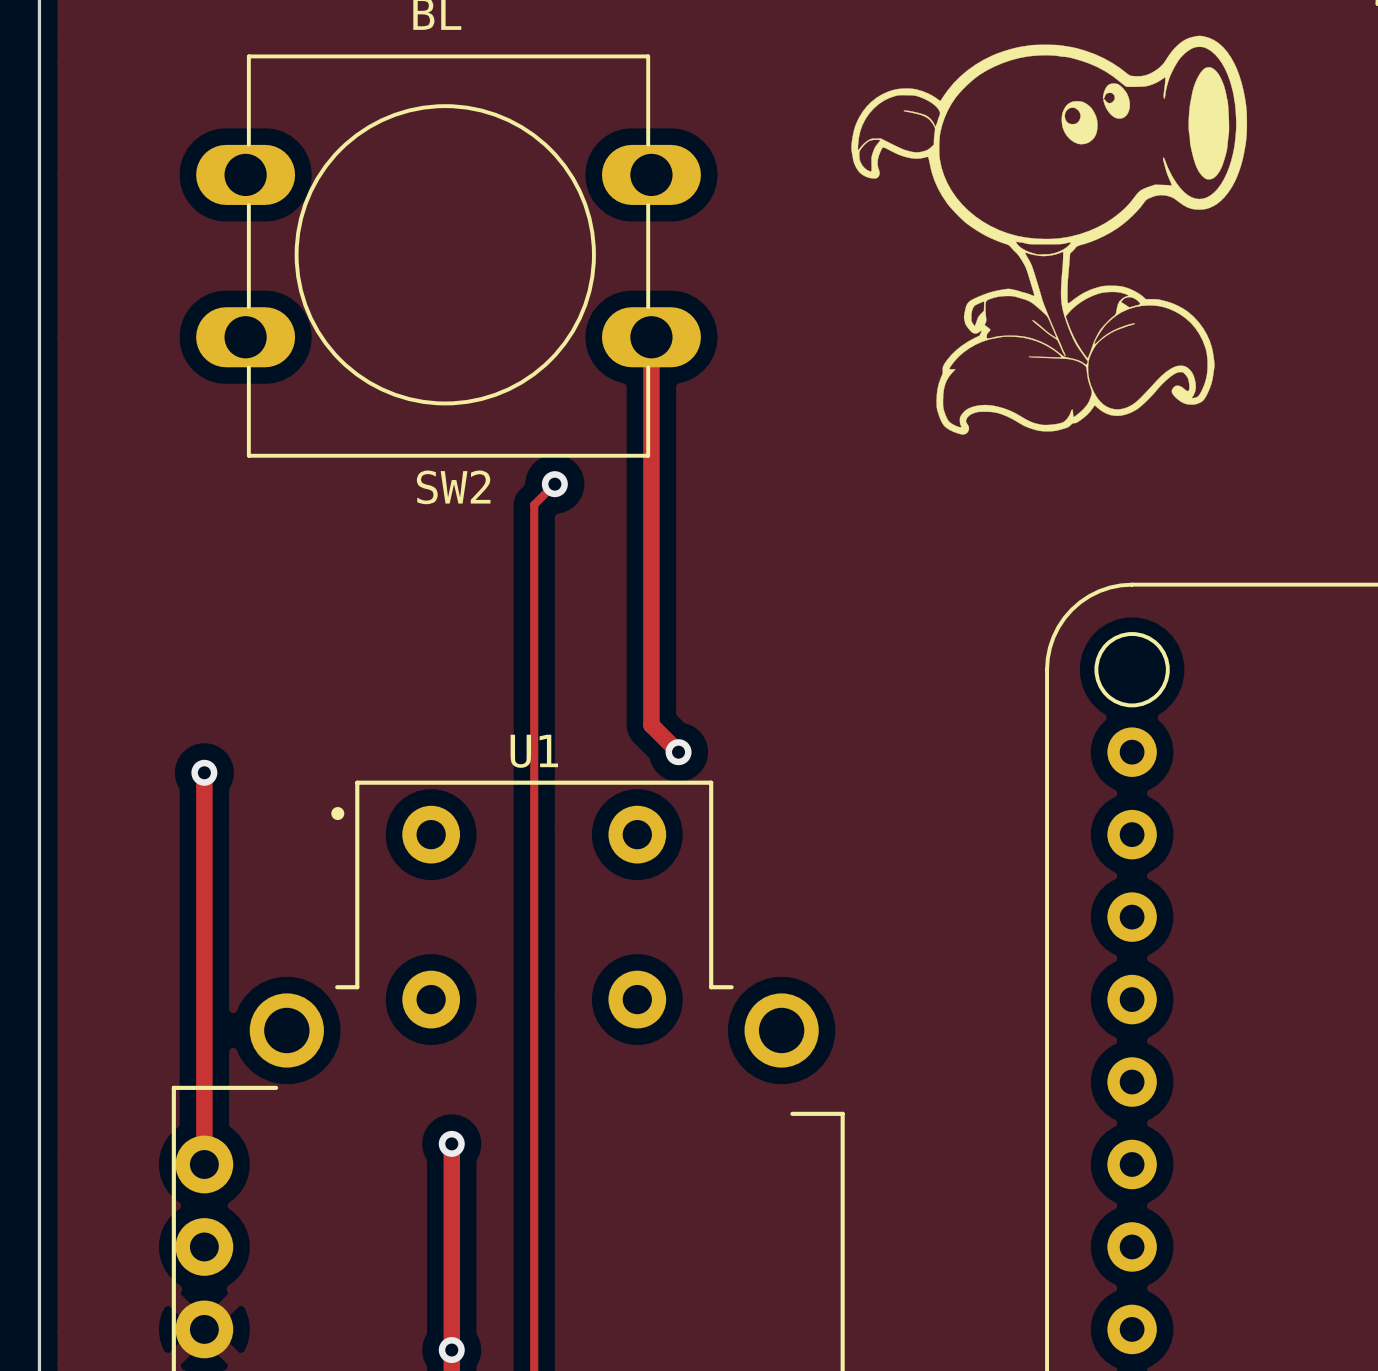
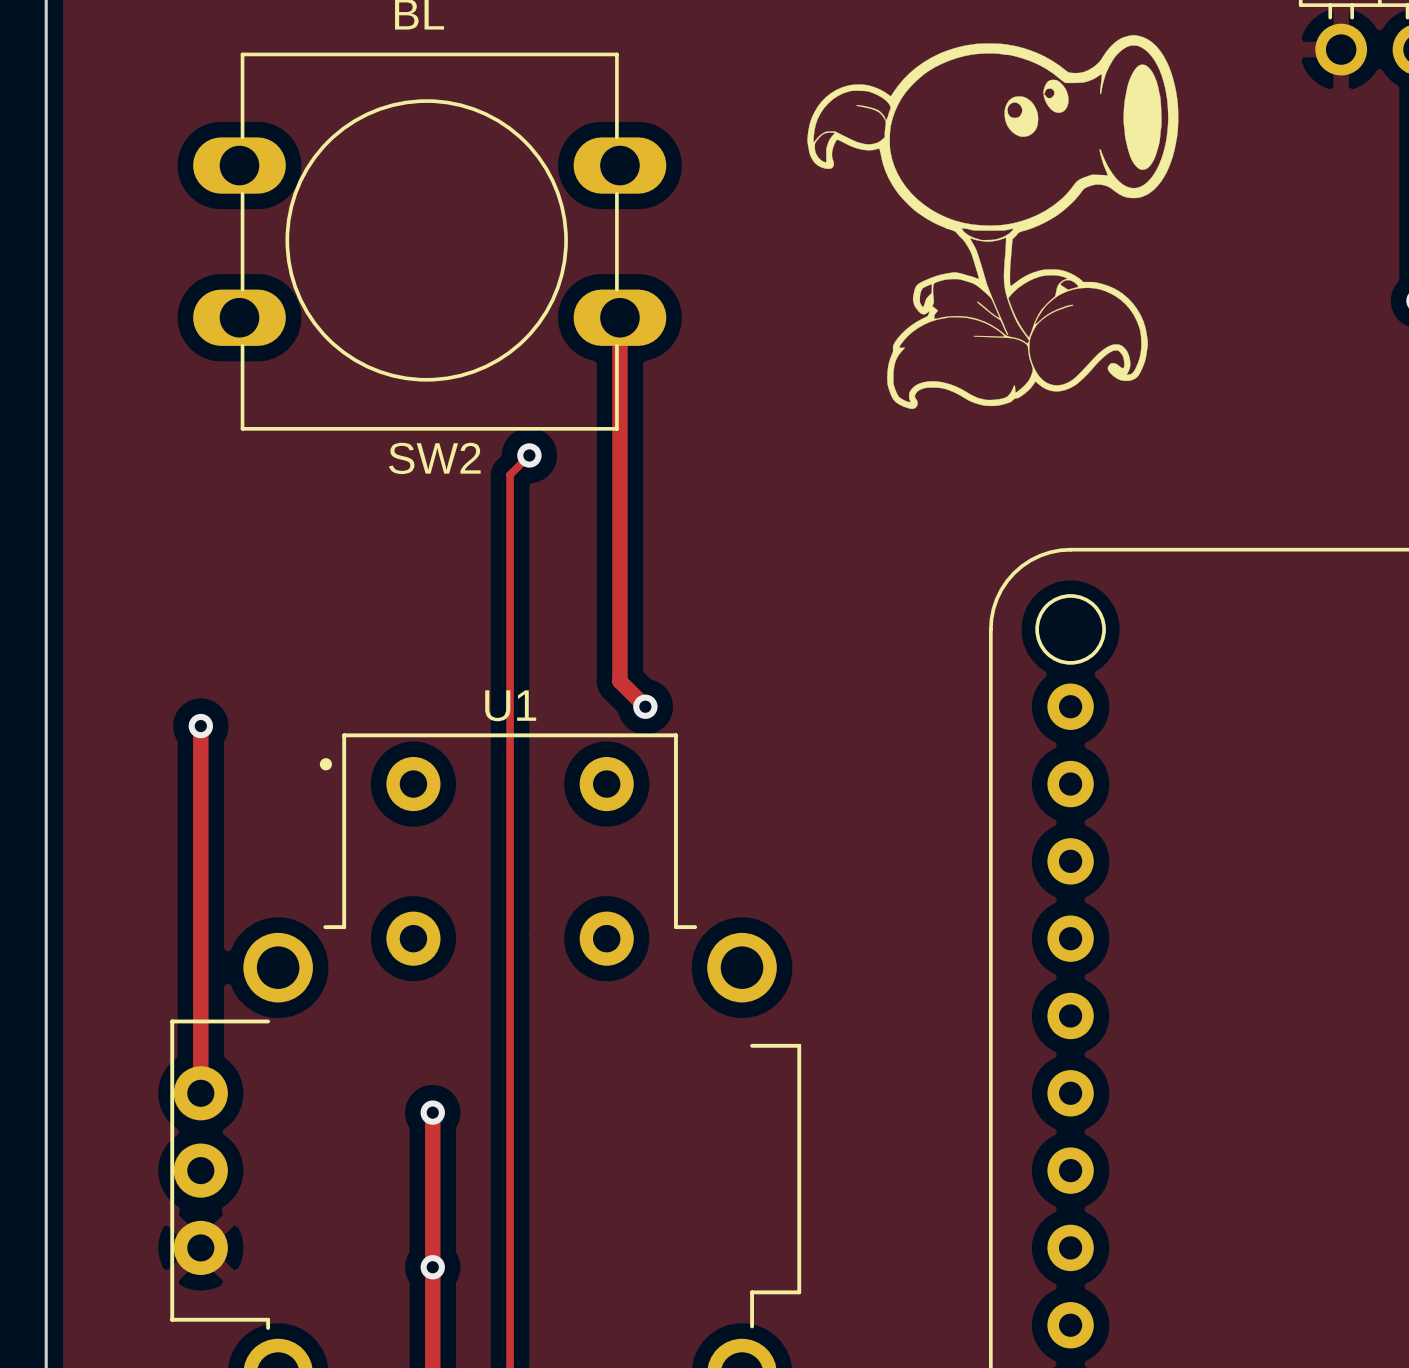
track: (451, 1143) (451, 1185) -> none
via position: (451, 1143) -> (432, 1112)

